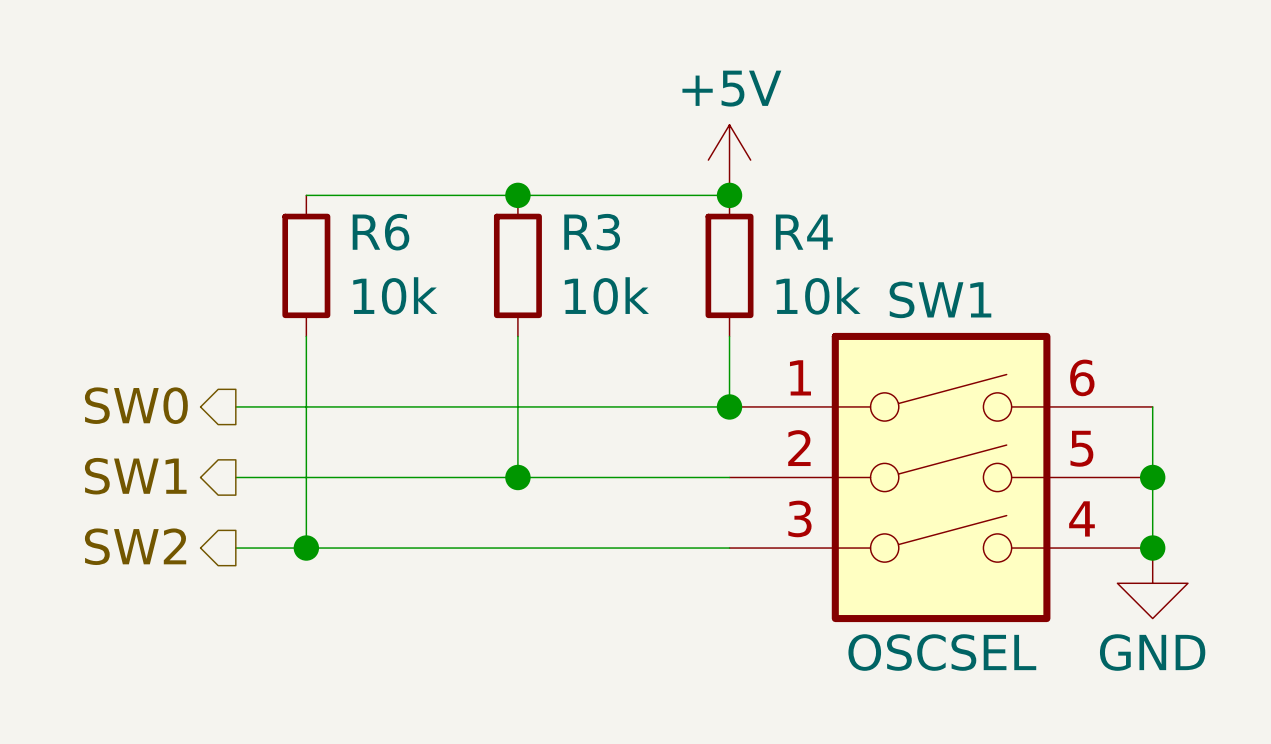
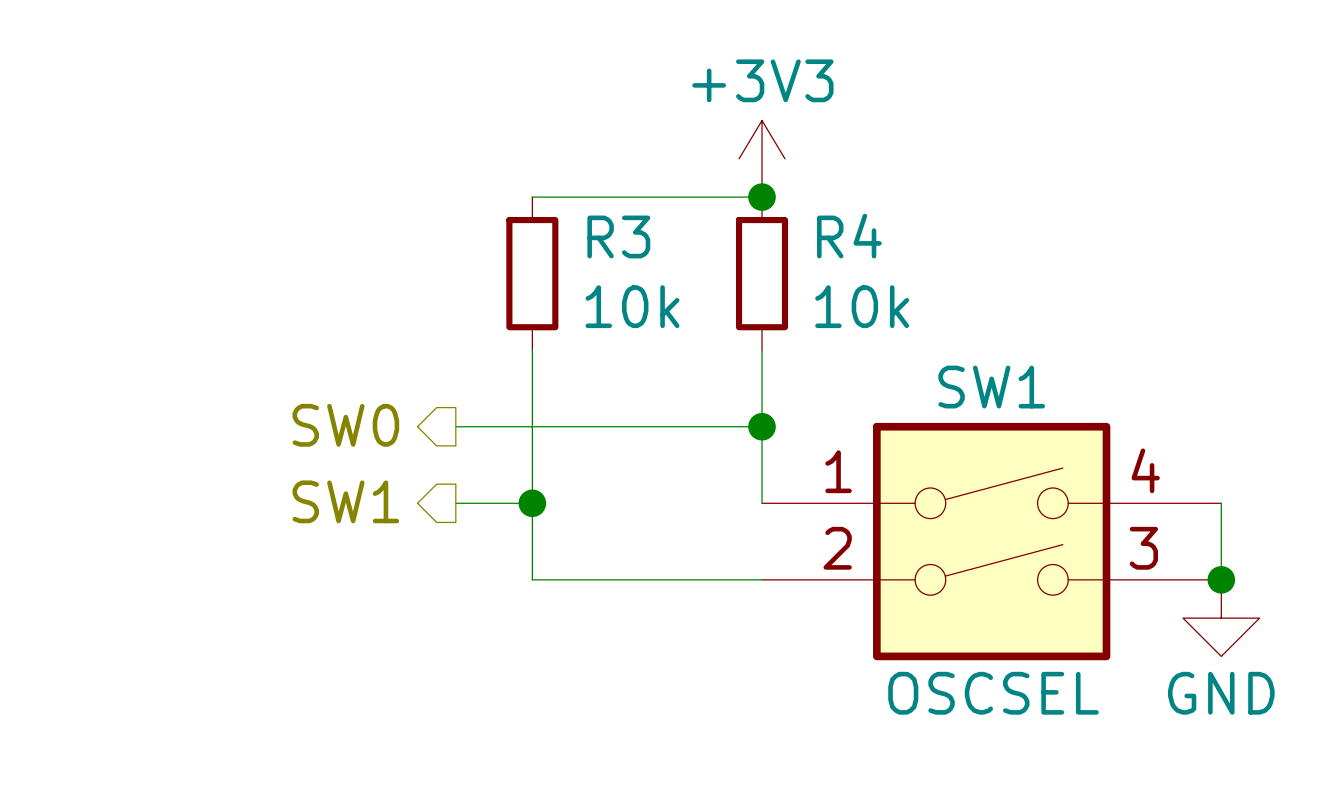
power symbol: +5V (729, 160) -> +3V3 (762, 158)
wire: (306, 195) (517, 195) -> none
junction: (517, 195) -> none
R6: 10k (306, 265) -> none
SW1 symbol: [729, 332, 1153, 623] -> [762, 422, 1222, 661]
wire: (306, 336) (306, 548) -> none
hierarchical label position: SW0 (136, 405) -> SW0 (345, 425)
wire: (235, 406) (447, 406) -> none
wire: (1152, 406) (1152, 477) -> none
hierarchical label position: SW1 (135, 476) -> SW1 (345, 501)
wire: (235, 477) (447, 477) -> none
wire: (517, 477) (729, 477) -> (762, 426) (762, 503)
junction: (1152, 477) -> none
hierarchical label: SW2 (135, 546) -> none
wire: (235, 548) (517, 548) -> (532, 503) (532, 579)
junction: (306, 548) -> none

